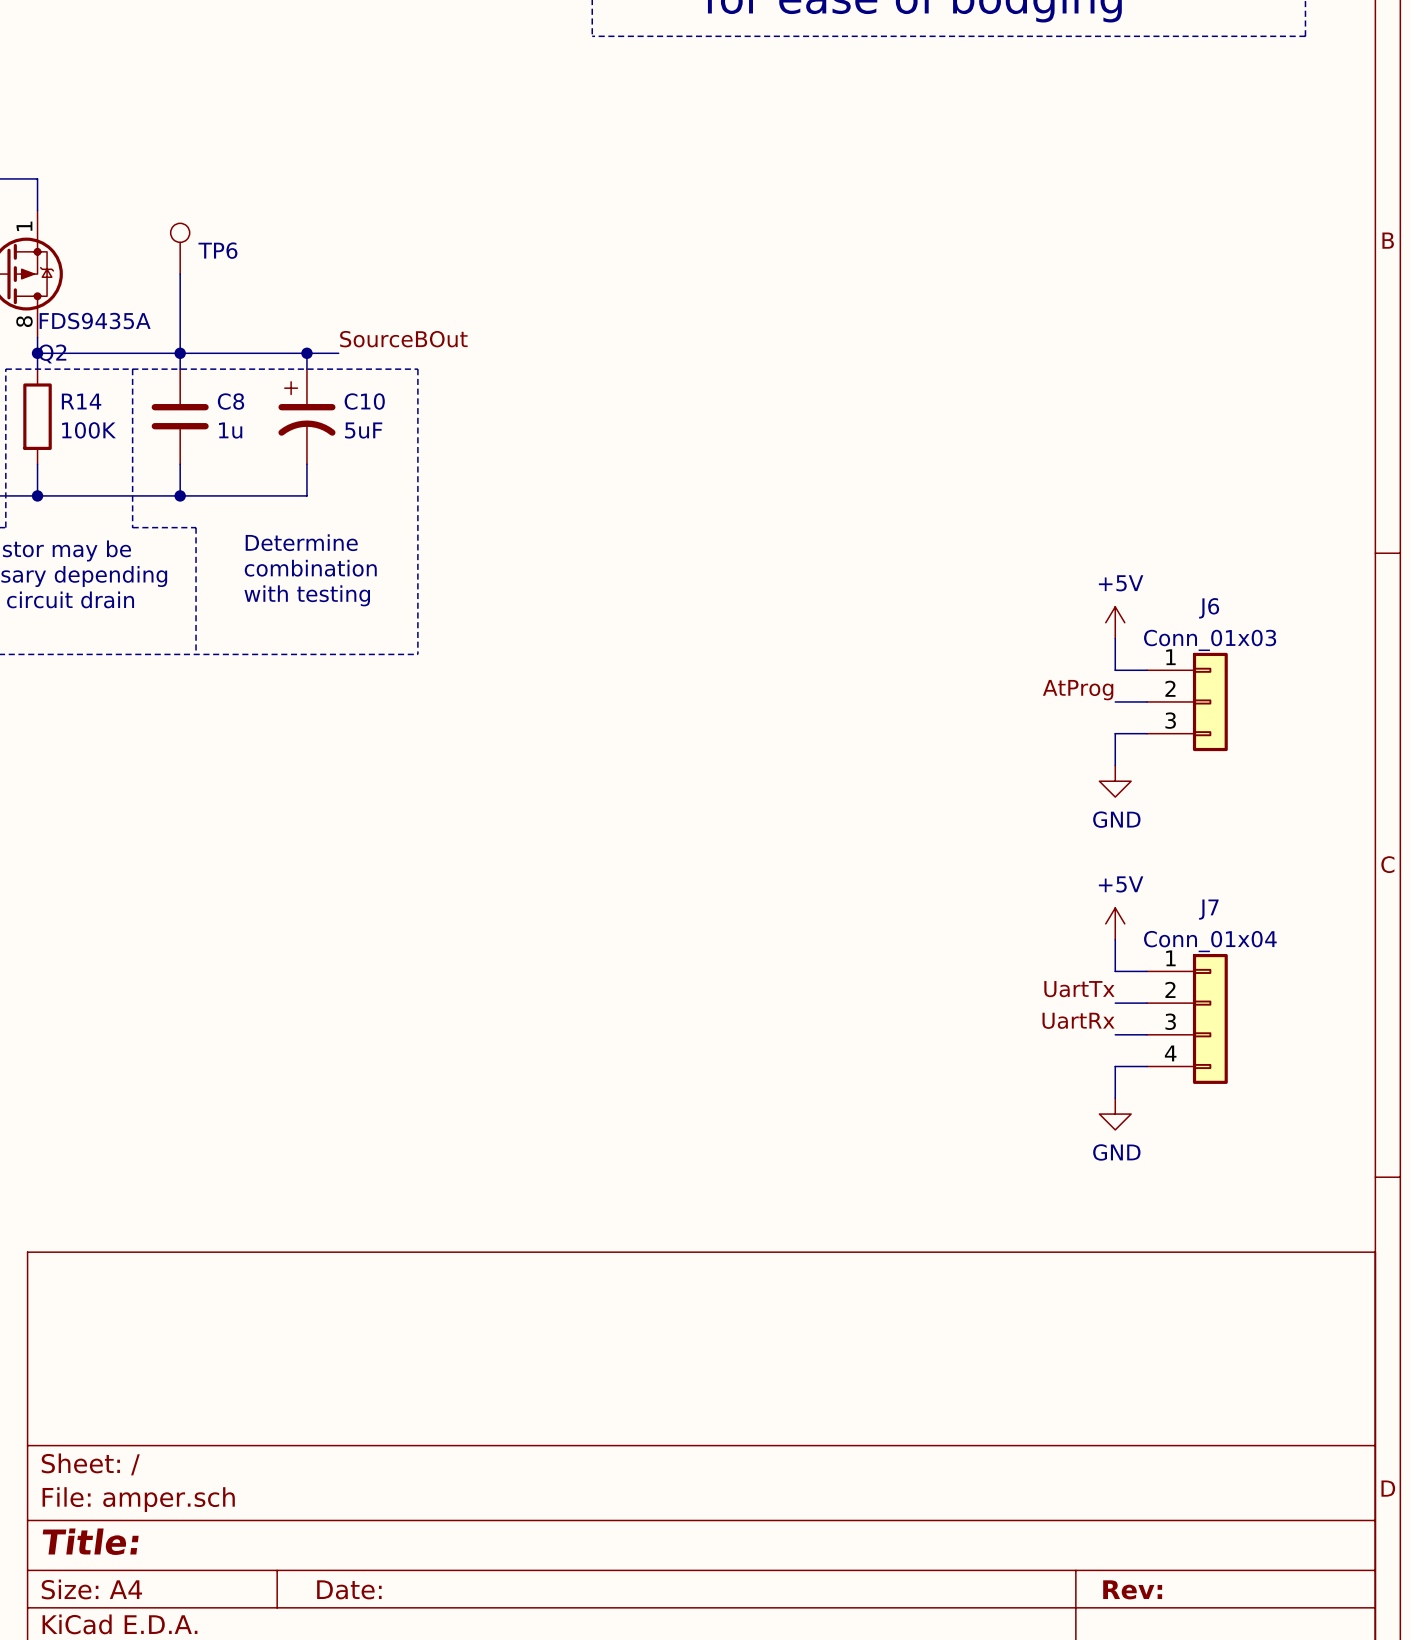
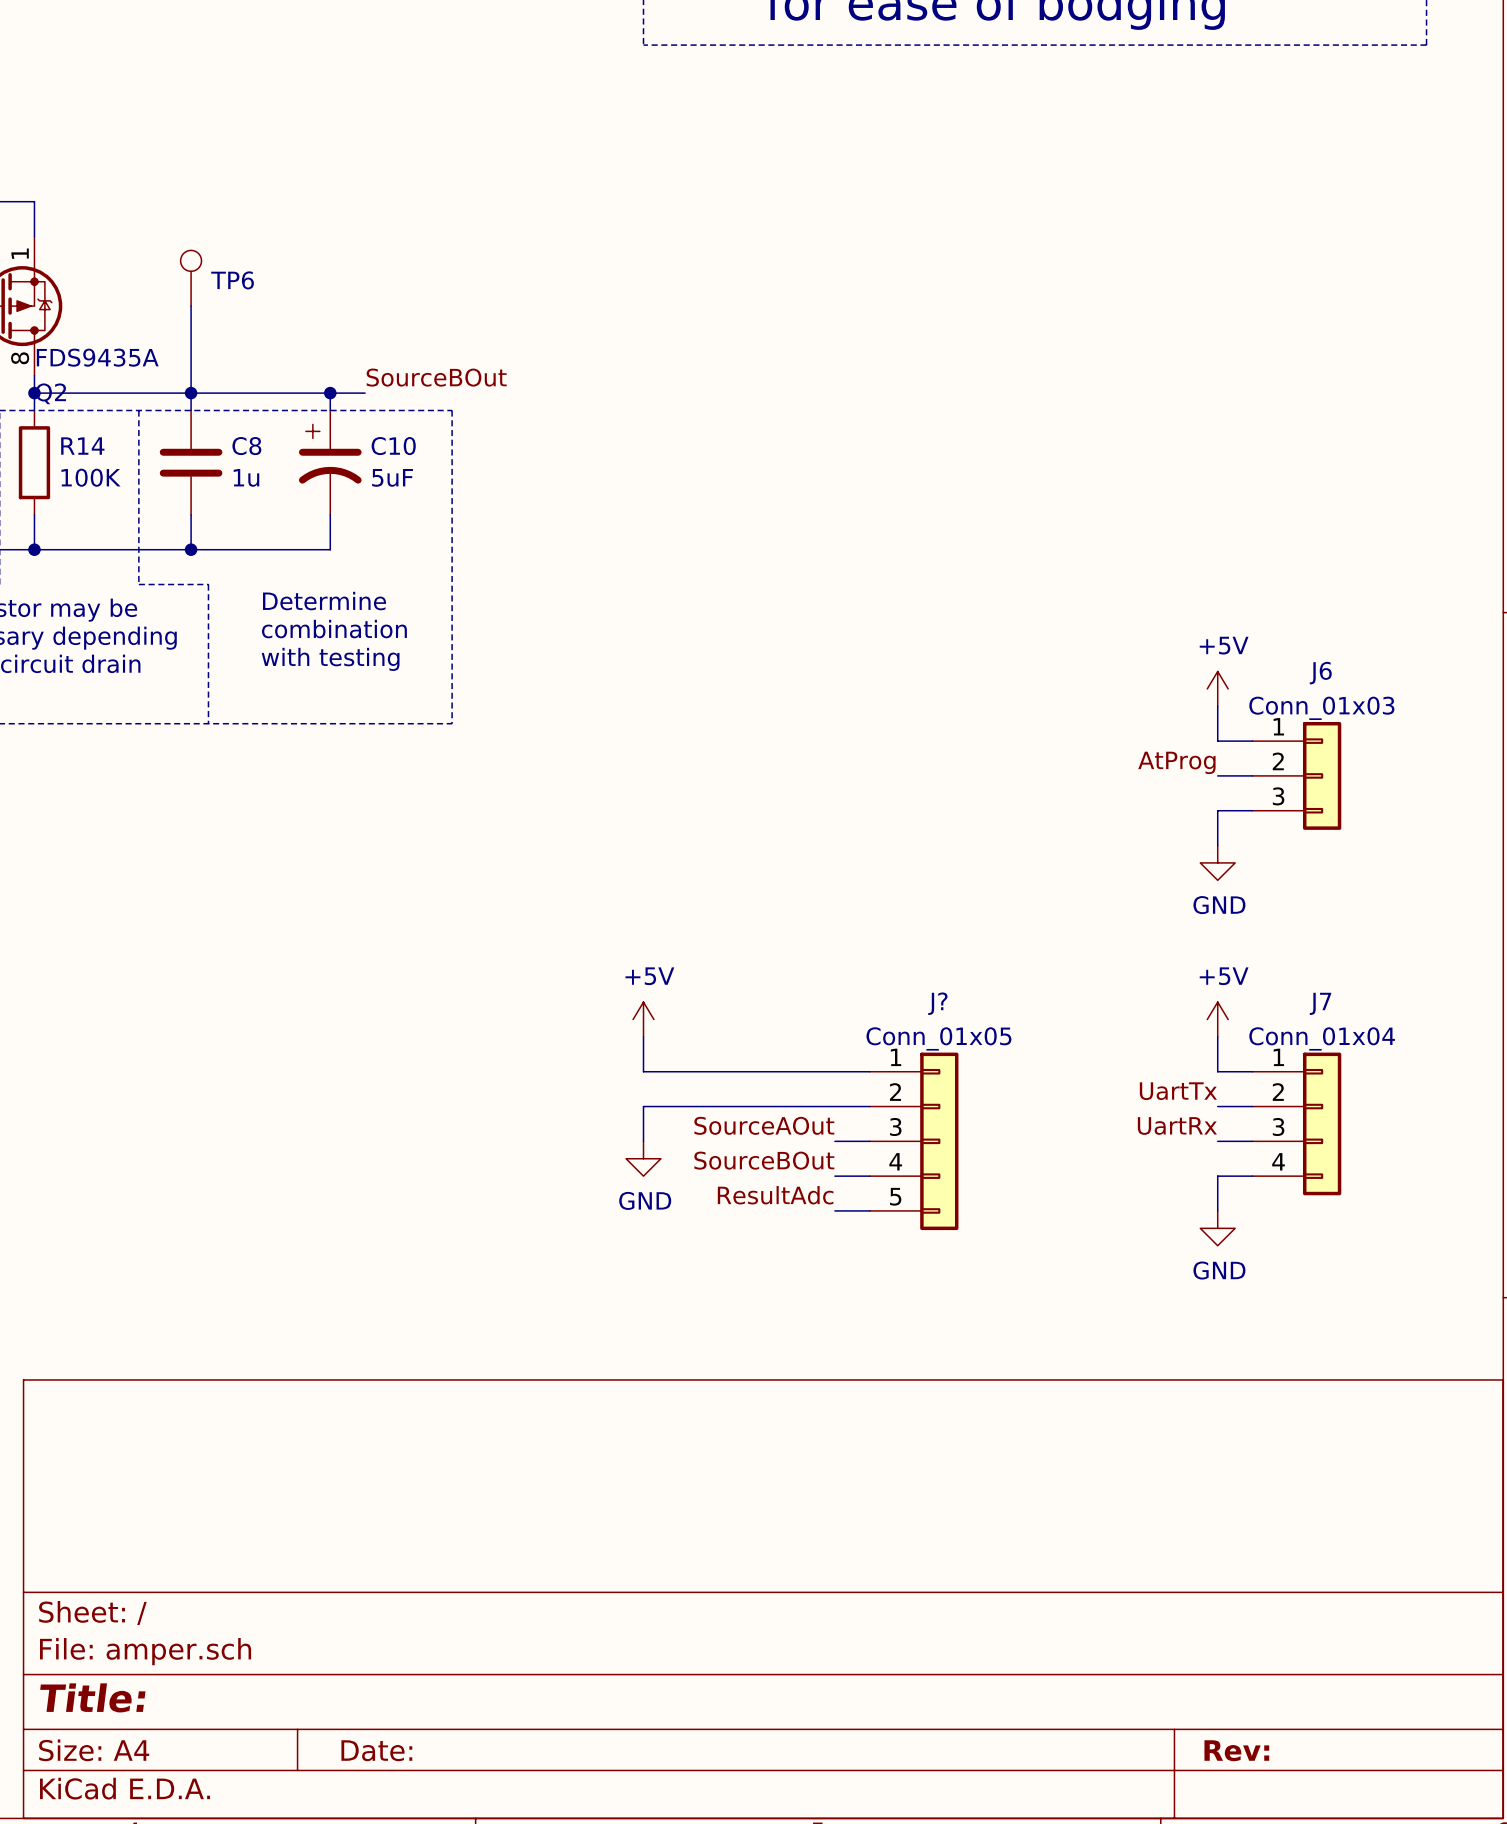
power symbol: none -> +5V (643, 1019)
wire: none -> (643, 1036) (643, 1071) (869, 1071)
wire: none -> (869, 1106) (643, 1106) (643, 1141)
label: none -> SourceAOut (764, 1125)
wire: none -> (834, 1141) (869, 1141)
J?: none -> Conn_01x05 (914, 1141)
power symbol: none -> GND (643, 1158)
label: none -> SourceBOut (764, 1160)
wire: none -> (834, 1176) (869, 1176)
label: none -> ResultAdc (775, 1195)
wire: none -> (834, 1210) (869, 1210)

